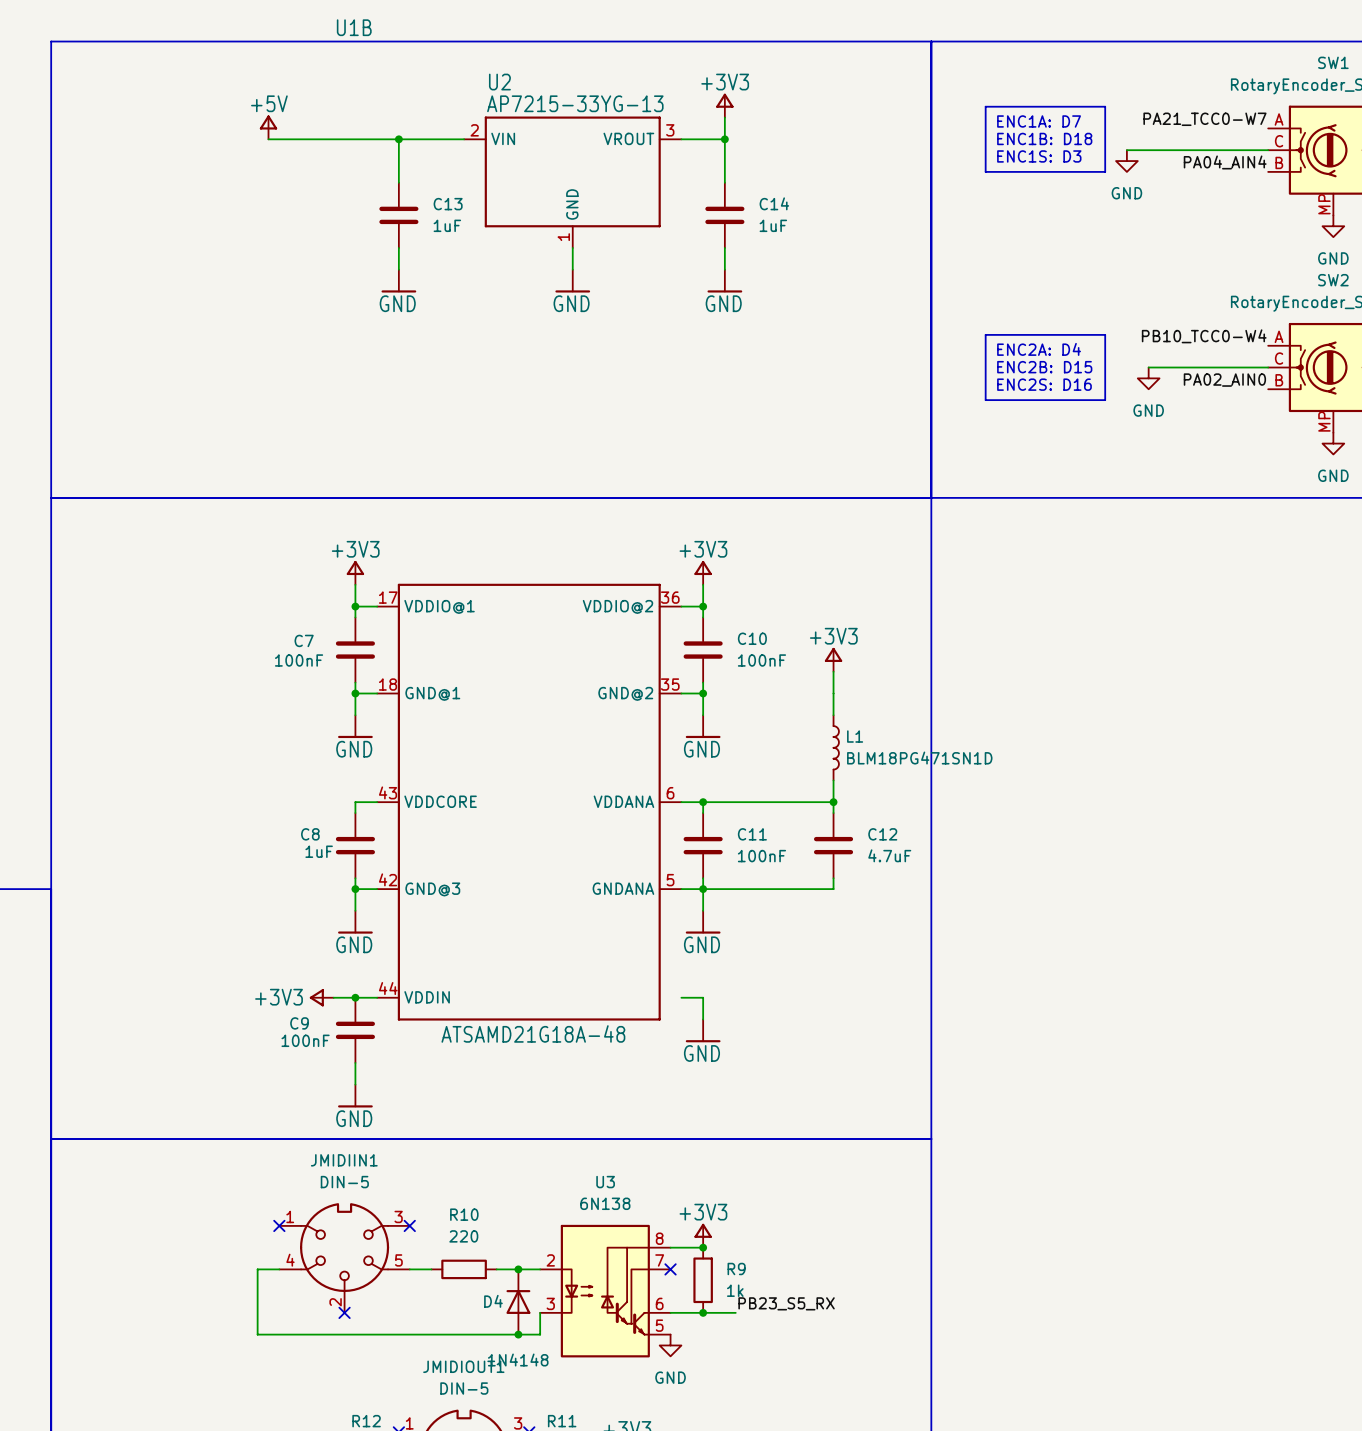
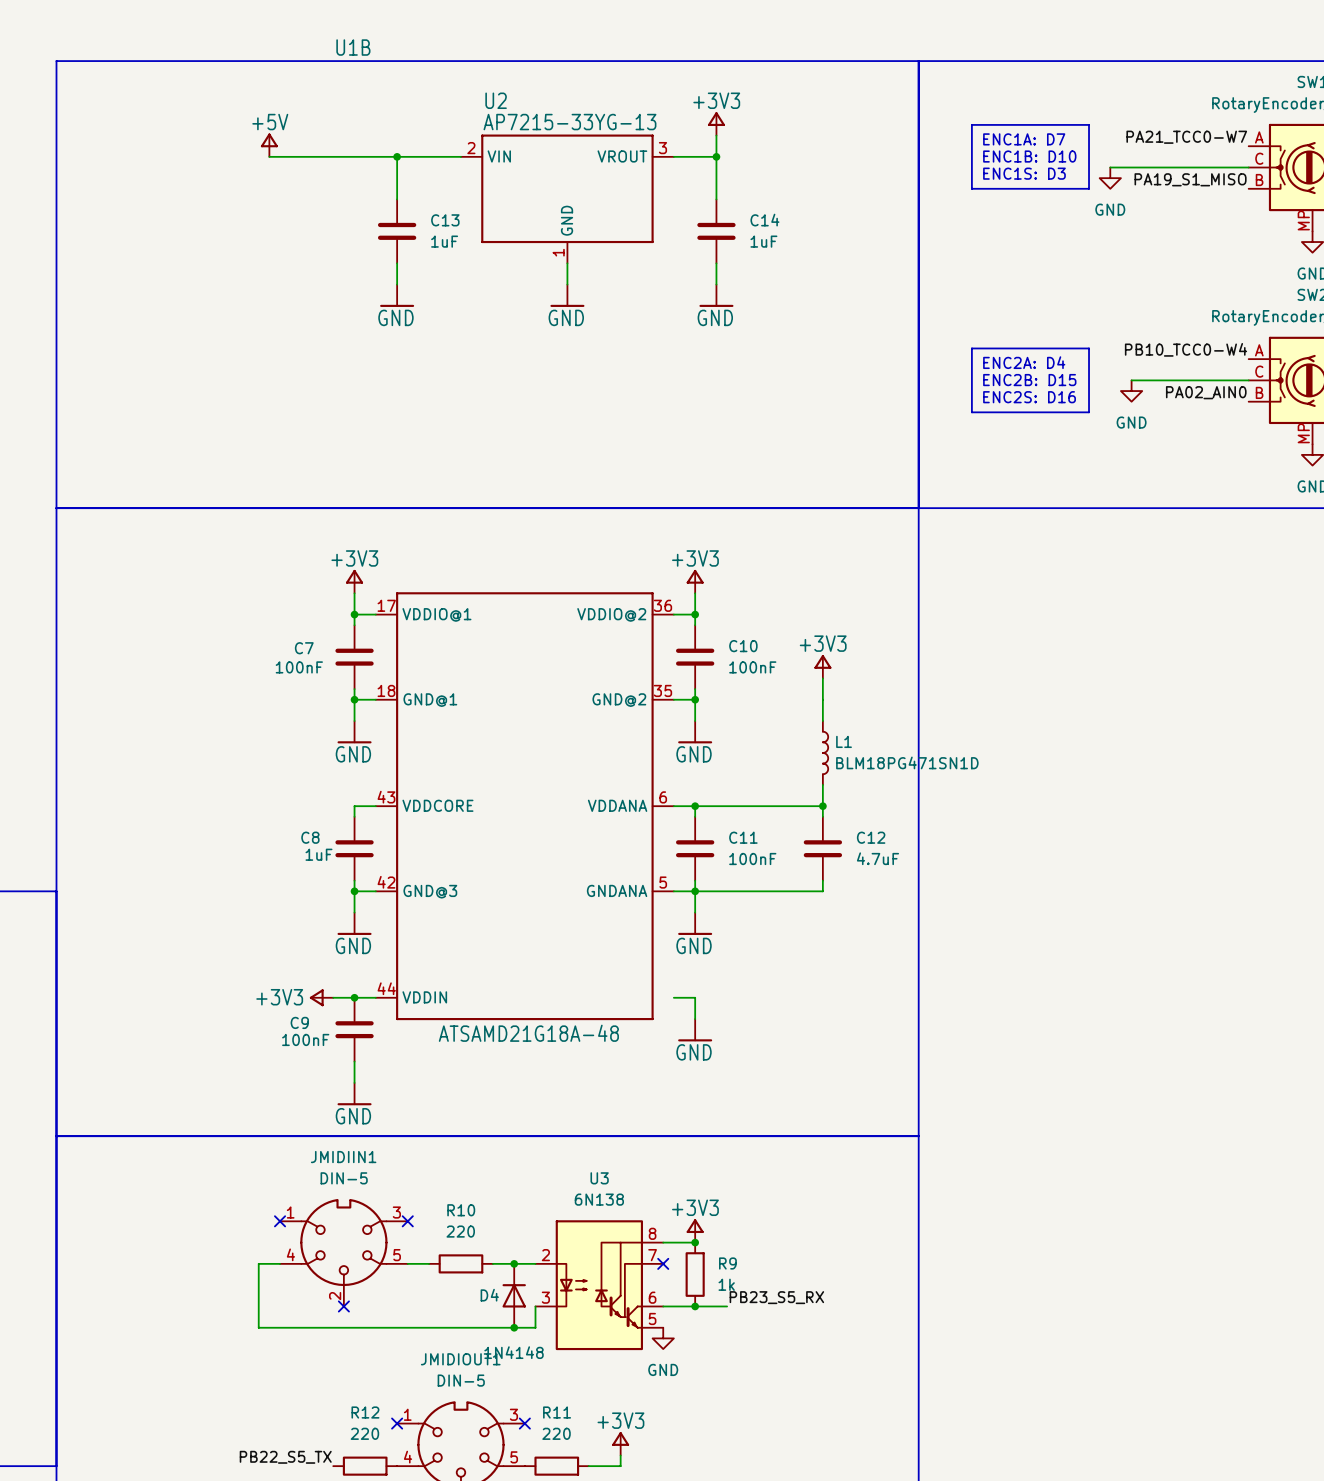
text: ENC1B: D18 (1044, 138) -> ENC1B: D10 (1029, 156)
label: PA04_AIN4 (1225, 162) -> PA19_S1_MISO (1190, 179)

